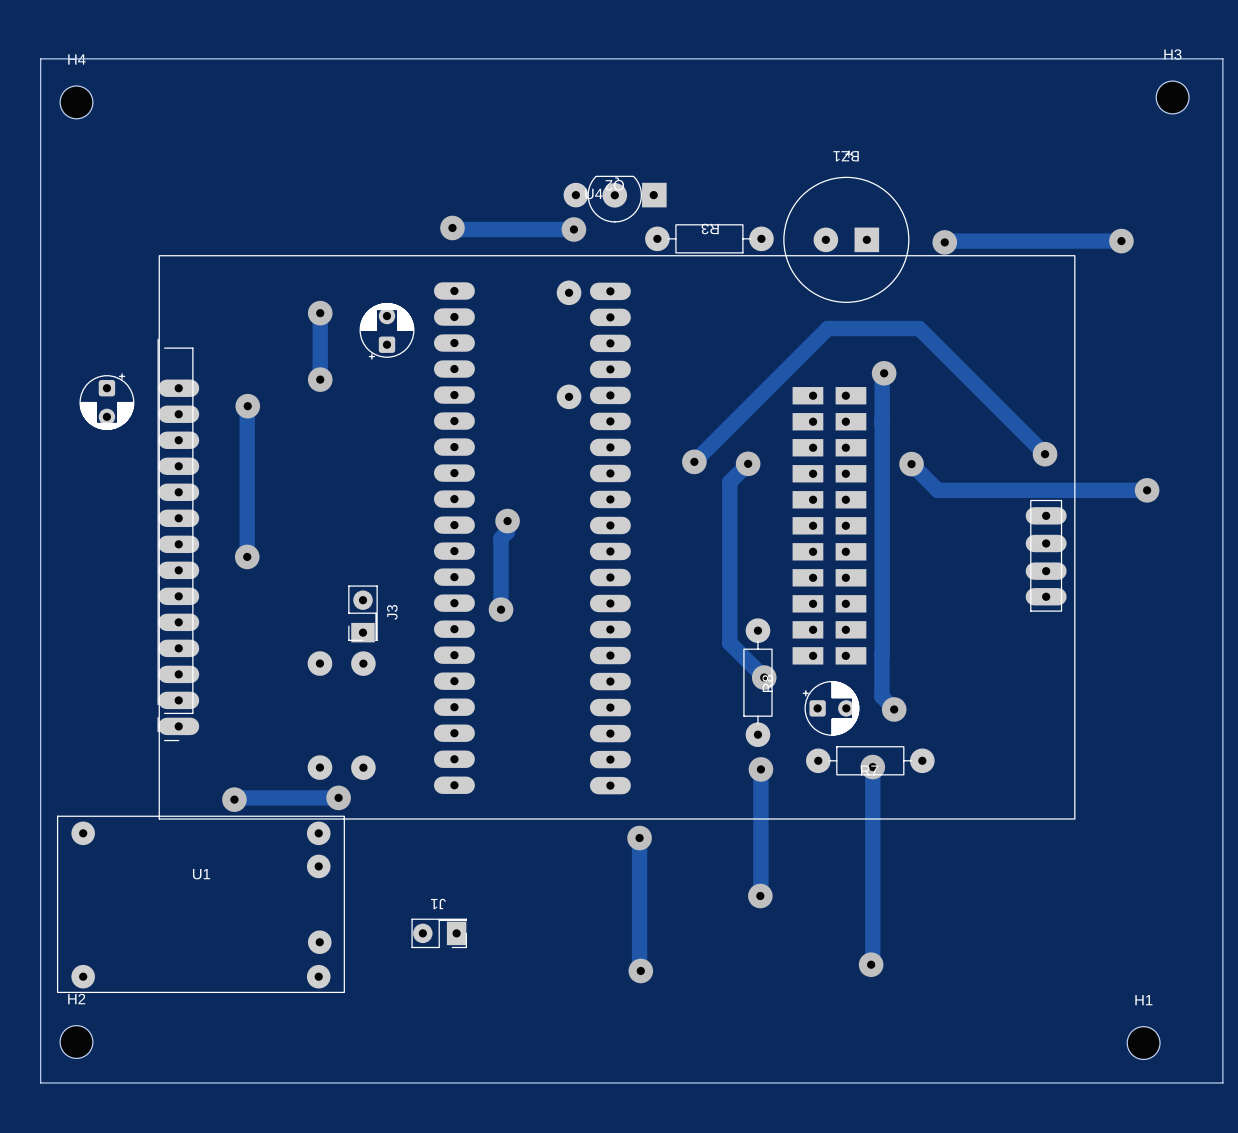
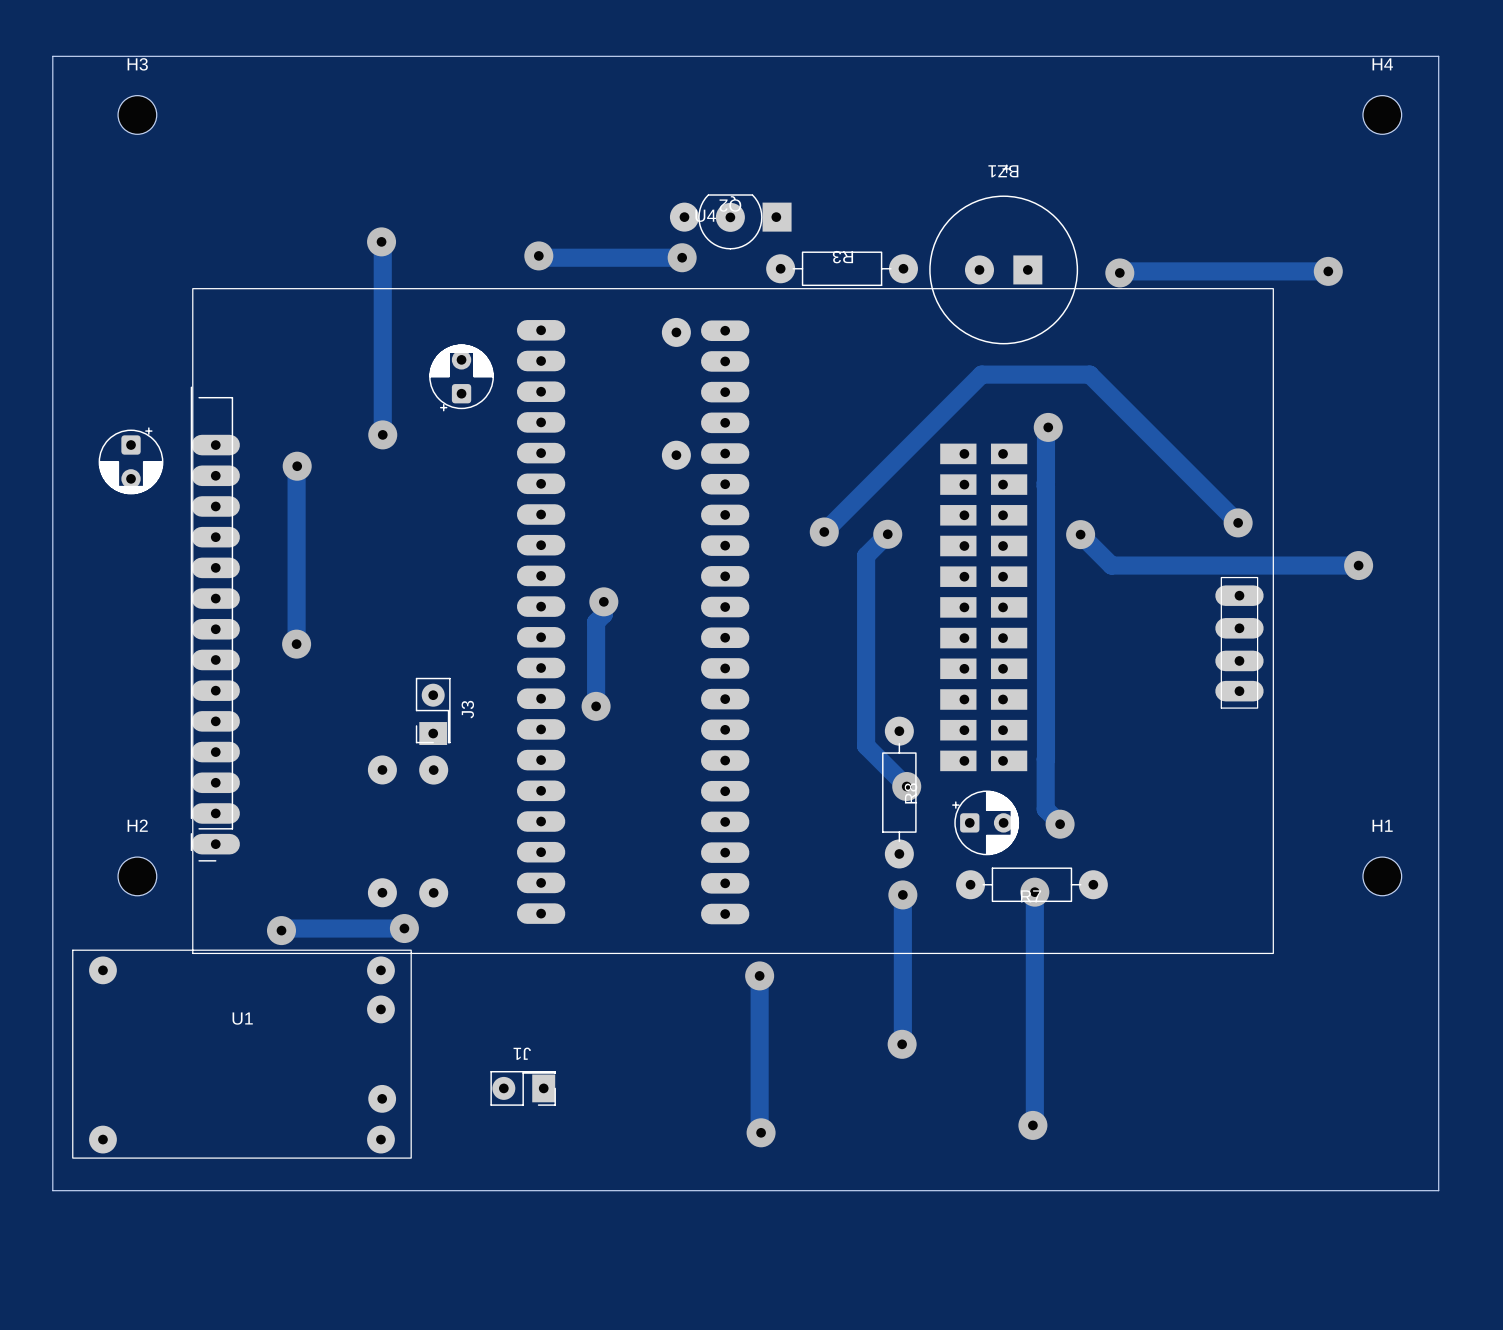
board edge: (1214, 58) (1222, 58) (1222, 1082) (40, 1082) (40, 1020) -> (1438, 56) (1438, 1190) (52, 1190)
H3 position: (1172, 97) -> (137, 114)
H4 position: (76, 102) -> (1382, 114)
track: none -> (381, 241) (382, 356)
via: none -> (381, 241)
via: (320, 313) -> none
H2 position: (76, 1042) -> (137, 876)
H1 position: (1143, 1043) -> (1382, 876)

